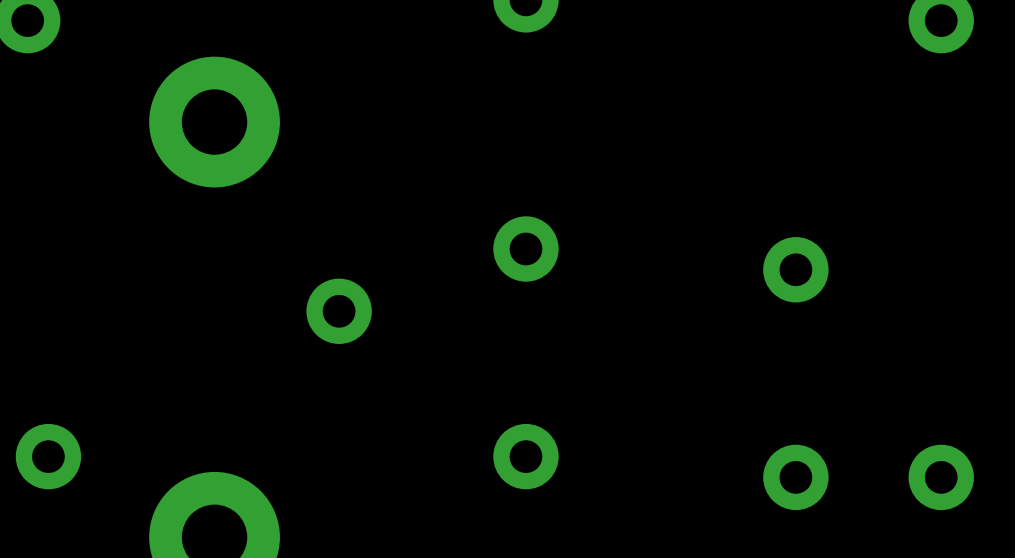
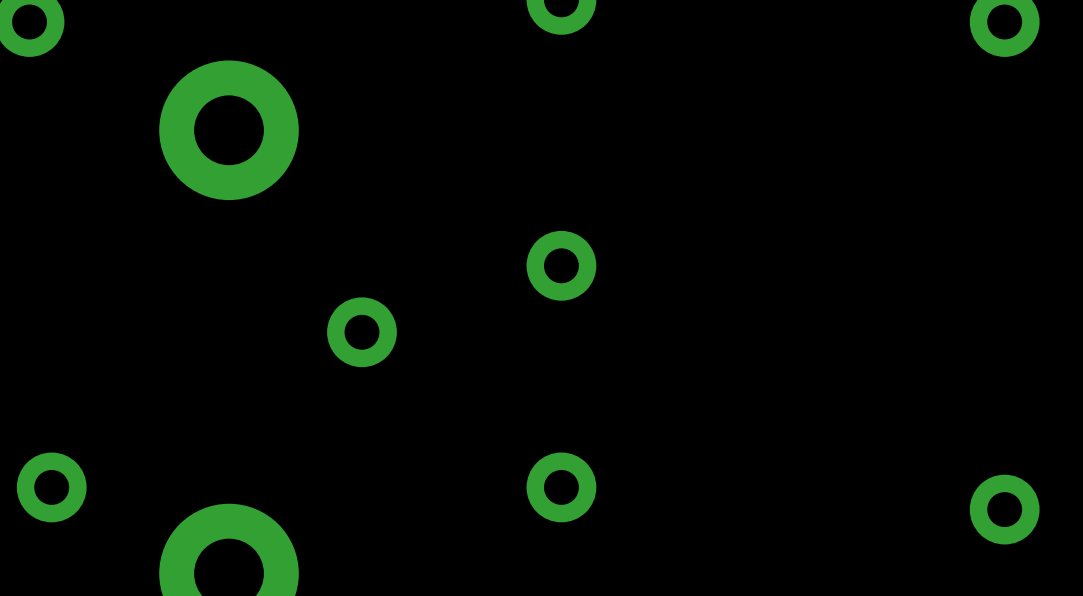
via: (795, 269) -> none
via: (795, 477) -> none

